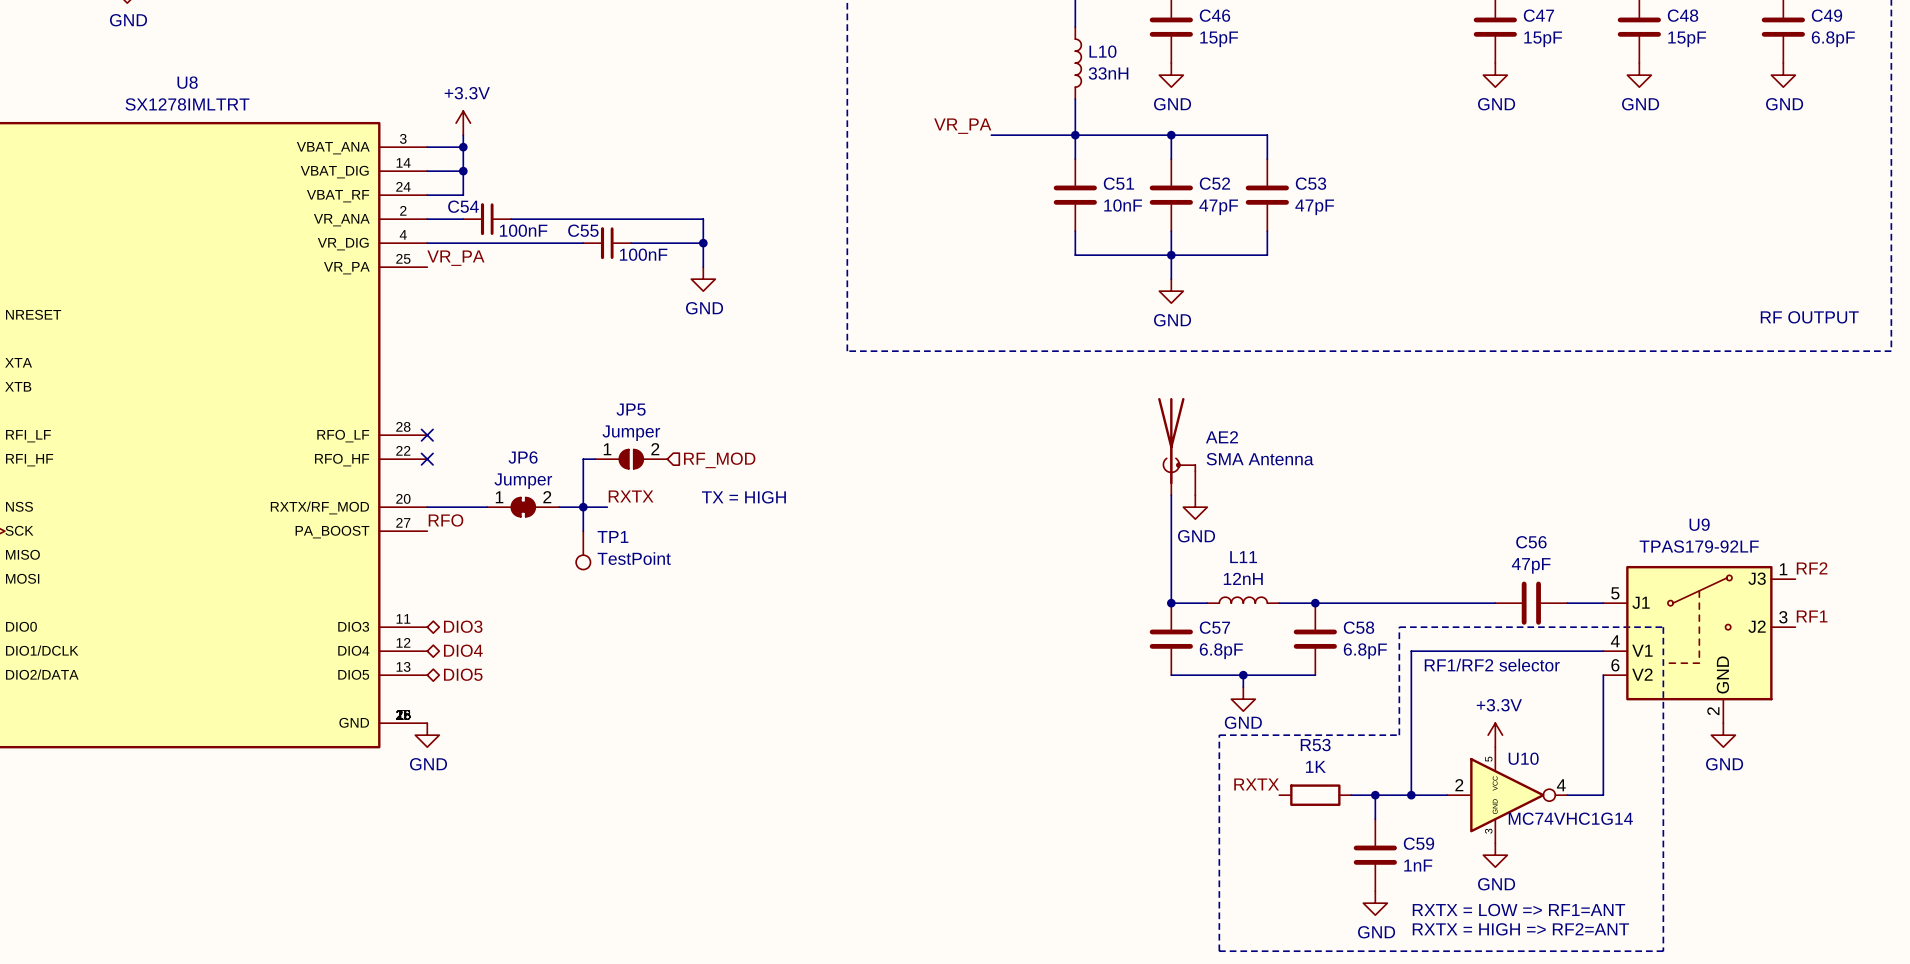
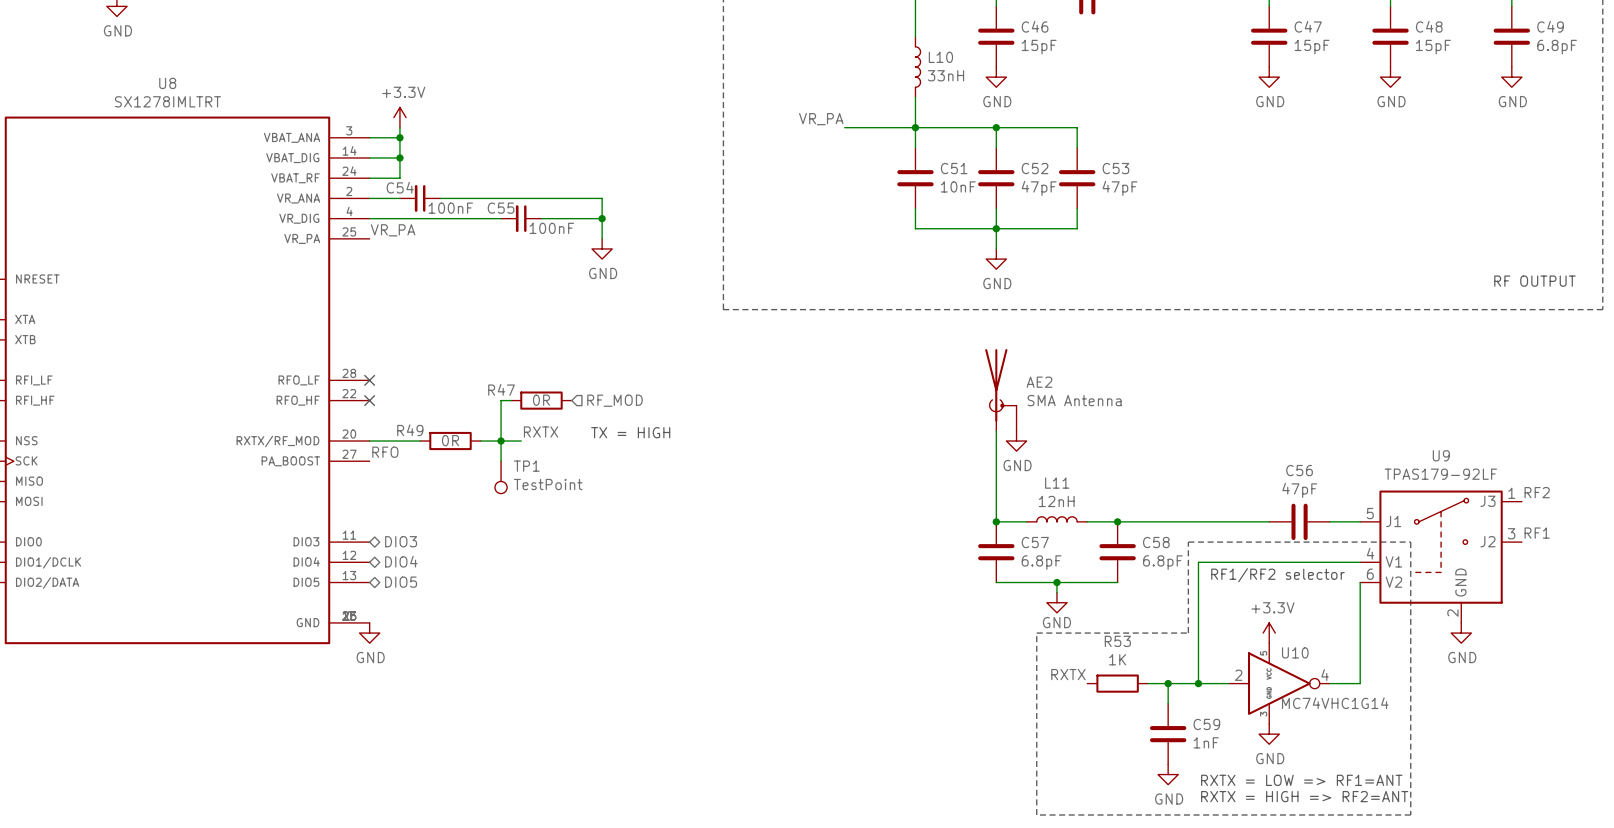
JP5: Jumper (631, 459) -> none
R47: none -> 0R (541, 400)
JP6: Jumper (523, 507) -> none
R49: none -> 0R (450, 441)

